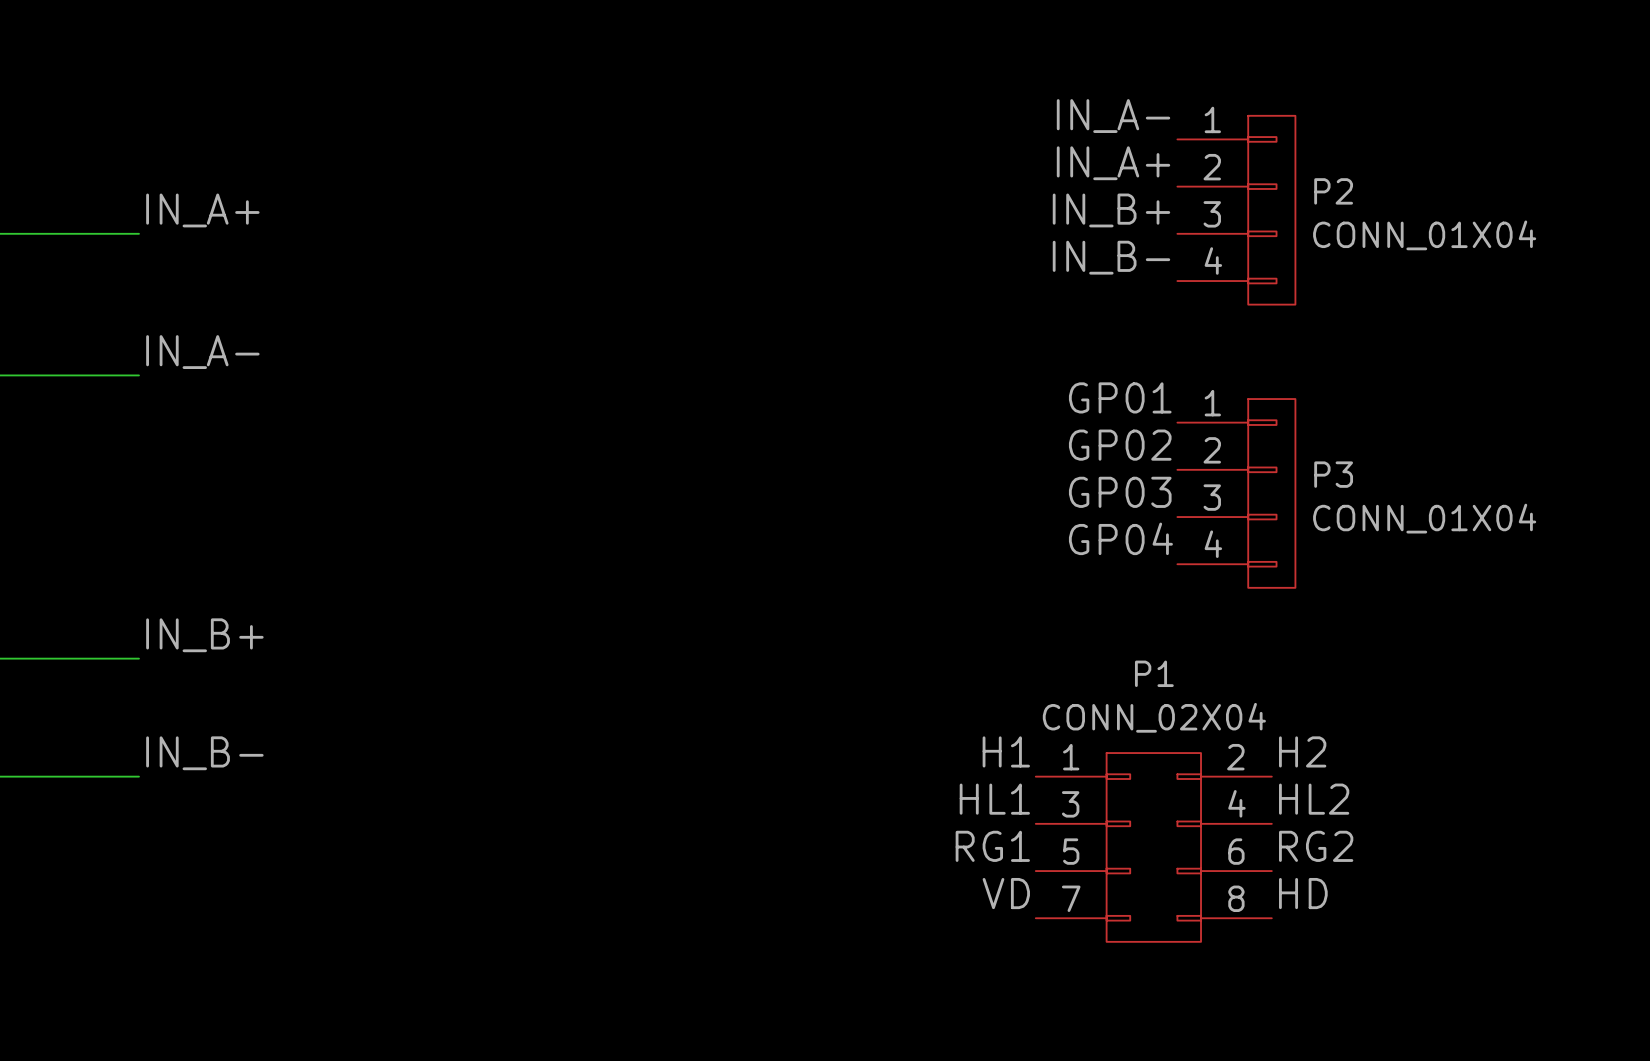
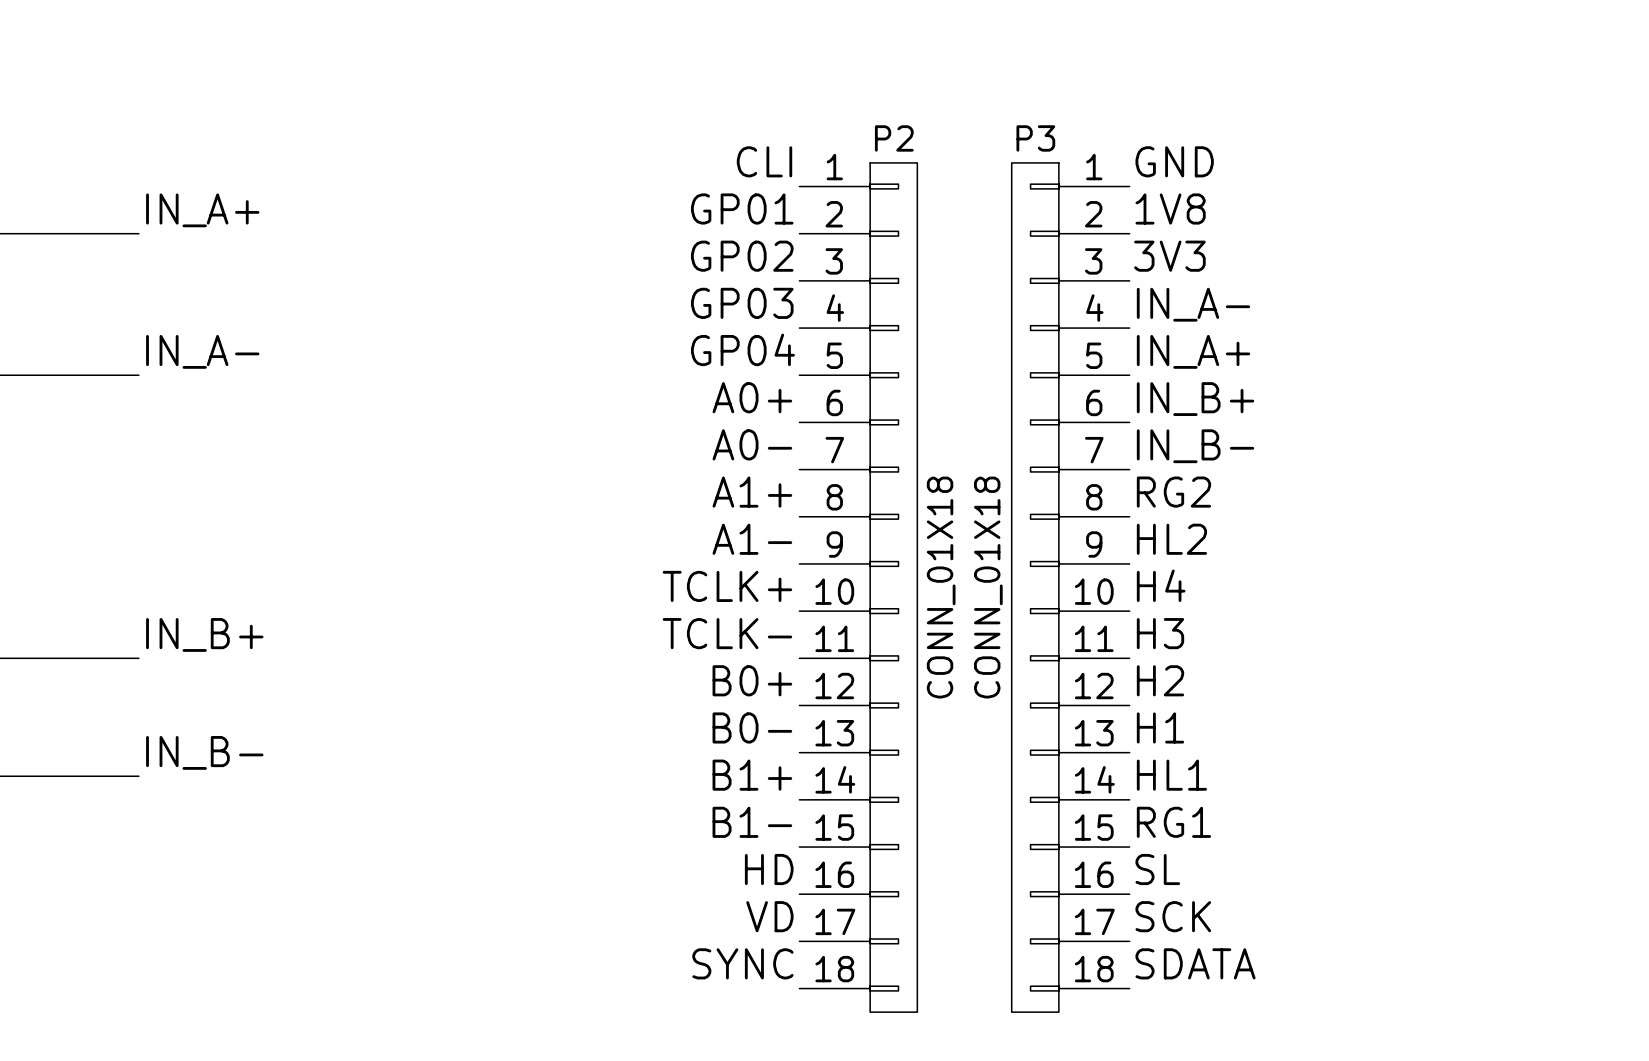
P2 symbol: [1177, 115, 1296, 305] -> [799, 162, 918, 1013]
label position: IN_A- (1113, 116) -> IN_A- (1193, 304)
label: none -> CLI (764, 161)
label: none -> GND (1174, 161)
label position: IN_A+ (1113, 163) -> IN_A+ (1193, 351)
P2 name position: P2 (1333, 191) -> P2 (894, 138)
label: none -> 1V8 (1170, 209)
label position: IN_B+ (1111, 210) -> IN_B+ (1195, 399)
P2 value: CONN_01X04 (1424, 235) -> CONN_01X18 (941, 587)
label: none -> 3V3 (1169, 256)
label position: IN_B- (1111, 257) -> IN_B- (1195, 446)
label: none -> A0+ (752, 397)
label position: GP01 (1120, 397) -> GP01 (742, 209)
P3 symbol: [1177, 399, 1296, 588] -> [1011, 162, 1130, 1013]
label: none -> A0- (752, 444)
label position: GP02 (1120, 445) -> GP02 (742, 256)
P3 name position: P3 (1333, 474) -> P3 (1035, 138)
label: none -> A1+ (752, 492)
label position: GP03 (1120, 492) -> GP03 (742, 303)
P3 value: CONN_01X04 (1424, 518) -> CONN_01X18 (988, 587)
label position: GP04 (1120, 538) -> GP04 (742, 349)
label: none -> A1- (752, 539)
label: none -> TCLK+ (727, 586)
label: none -> H4 (1161, 585)
label: none -> TCLK- (727, 633)
label: none -> H3 (1160, 633)
label: none -> B0+ (752, 680)
label: none -> B0- (752, 727)
label position: H1 (1006, 751) -> H1 (1160, 727)
label position: H2 (1302, 751) -> H2 (1160, 680)
label: none -> B1+ (752, 775)
label position: HL1 (994, 799) -> HL1 (1171, 775)
label position: HL2 (1314, 799) -> HL2 (1171, 539)
label: none -> B1- (752, 822)
label position: RG1 (992, 846) -> RG1 (1173, 822)
label position: RG2 (1316, 846) -> RG2 (1173, 492)
P1: CONN_02X04 (1153, 847) -> none
label: none -> HD (769, 869)
label: none -> SL (1157, 869)
label position: VD (1006, 893) -> VD (769, 916)
label: HD (1303, 893) -> none
label: none -> SCK (1173, 916)
label: none -> SYNC (742, 963)
label: none -> SDATA (1195, 963)

